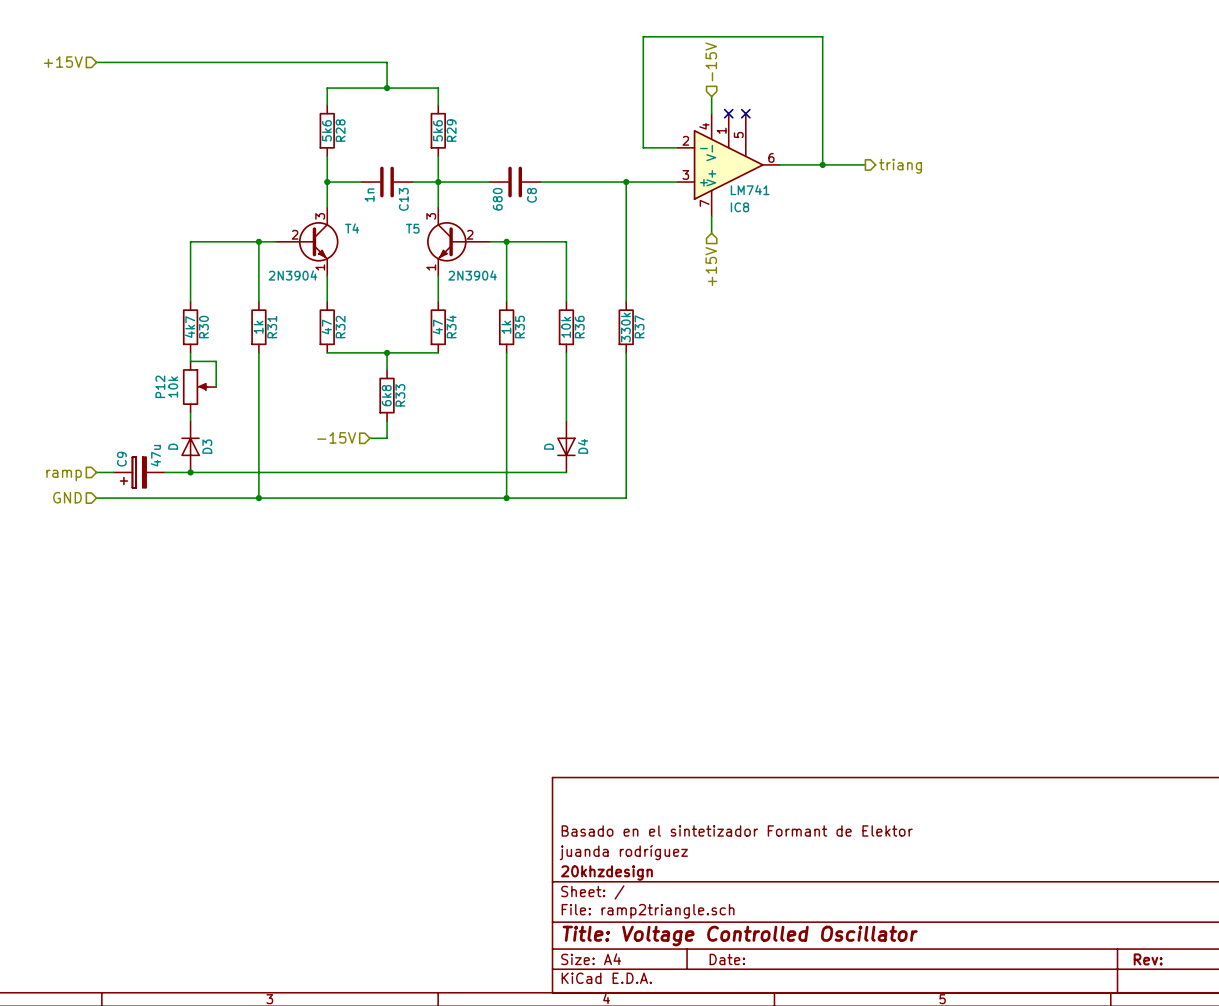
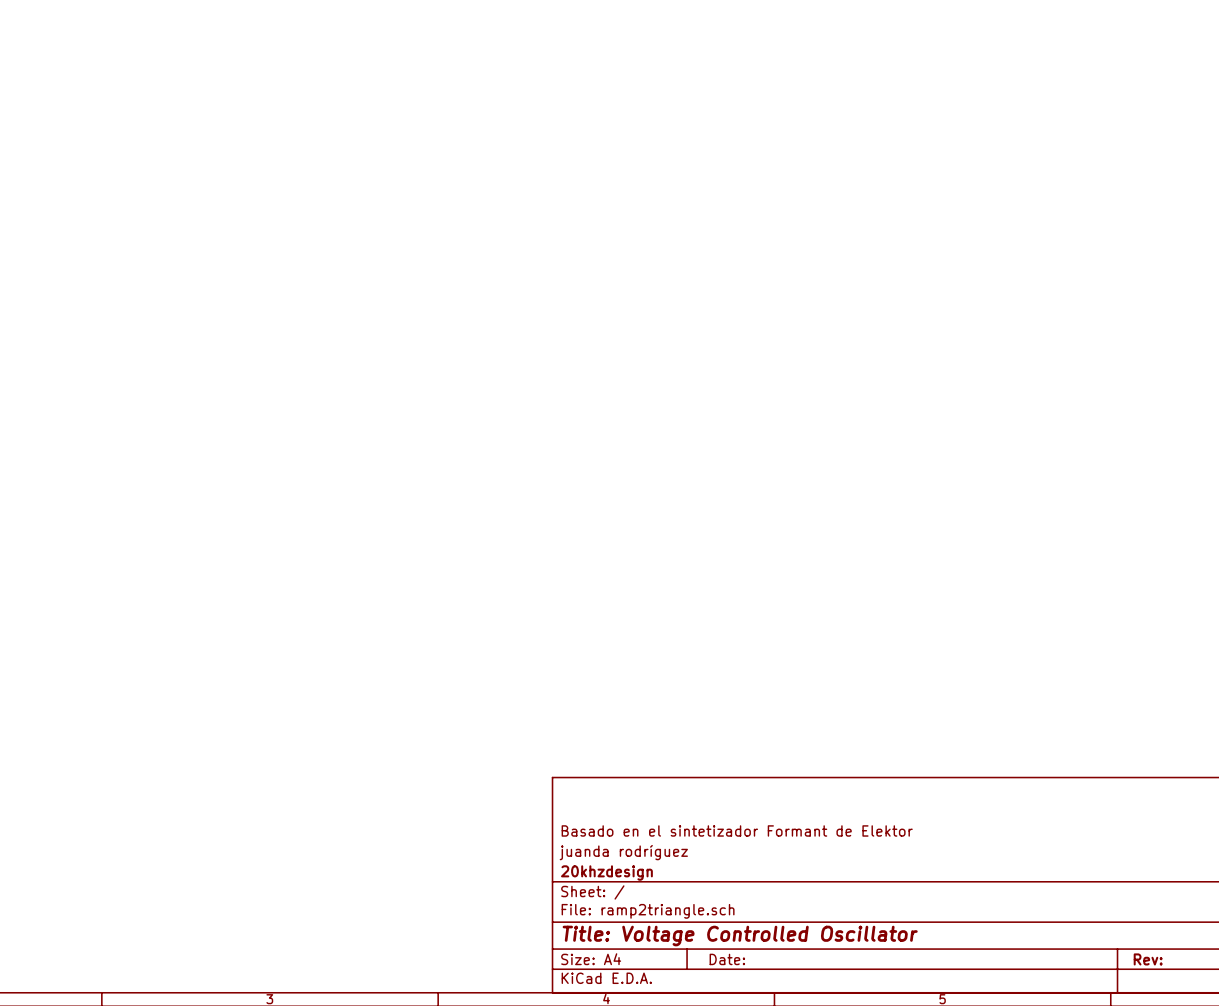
hierarchical label: -15V (711, 61) -> none
hierarchical label: +15V (63, 62) -> none
wire: (96, 62) (387, 62) (387, 88) -> none
junction: (387, 88) -> none
wire: (711, 96) (711, 113) -> none
wire: (327, 105) (327, 88) (438, 88) (438, 105) -> none
no-connect mark: (728, 113) -> none
no-connect mark: (745, 113) -> none
R28: 5k6 (327, 130) -> none
R29: 5k6 (438, 130) -> none
wire: (677, 147) (643, 147) (643, 36) (822, 36) (822, 164) -> none
wire: (327, 156) (327, 207) -> none
wire: (438, 156) (438, 207) -> none
IC8: LM741 (728, 164) -> none
wire: (779, 164) (865, 164) -> none
junction: (822, 164) -> none
hierarchical label: triang (900, 166) -> none
wire: (327, 182) (361, 182) -> none
junction: (327, 182) -> none
C13: 1n (387, 182) -> none
wire: (412, 182) (489, 182) -> none
junction: (438, 182) -> none
C8: 680 (515, 182) -> none
wire: (540, 182) (677, 182) -> none
wire: (626, 182) (626, 301) -> none
junction: (626, 182) -> none
wire: (711, 216) (711, 233) -> none
wire: (258, 241) (258, 301) -> none
junction: (258, 241) -> none
wire: (275, 241) (190, 241) (190, 301) -> none
T4: 2N3904 (307, 241) -> none
T5: 2N3904 (458, 241) -> none
wire: (489, 241) (566, 241) (566, 301) -> none
wire: (506, 241) (506, 301) -> none
junction: (506, 241) -> none
hierarchical label: +15V (711, 266) -> none
wire: (327, 275) (327, 301) -> none
wire: (438, 275) (438, 301) -> none
R30: 4k7 (190, 327) -> none
R31: 1k (258, 327) -> none
R32: 47 (327, 327) -> none
R34: 47 (438, 327) -> none
R35: 1k (506, 327) -> none
R36: 10k (566, 327) -> none
R37: 330k (626, 327) -> none
wire: (190, 352) (190, 361) (216, 361) (216, 387) -> none
wire: (258, 352) (258, 498) -> none
wire: (327, 352) (438, 352) -> none
wire: (387, 352) (387, 369) -> none
junction: (387, 352) -> none
wire: (506, 352) (506, 498) -> none
wire: (566, 352) (566, 421) -> none
wire: (626, 352) (626, 498) (96, 498) -> none
P12: 10k (199, 387) -> none
R33: 6k8 (387, 395) -> none
wire: (190, 412) (190, 421) -> none
wire: (387, 421) (387, 438) (369, 438) -> none
hierarchical label: -15V (336, 437) -> none
D3: D (190, 446) -> none
D4: D (566, 446) -> none
wire: (96, 472) (113, 472) -> none
C9: 47u (139, 472) -> none
wire: (164, 472) (566, 472) -> none
junction: (190, 472) -> none
hierarchical label: ramp (64, 475) -> none
hierarchical label: GND (67, 497) -> none
junction: (258, 498) -> none
junction: (506, 498) -> none

